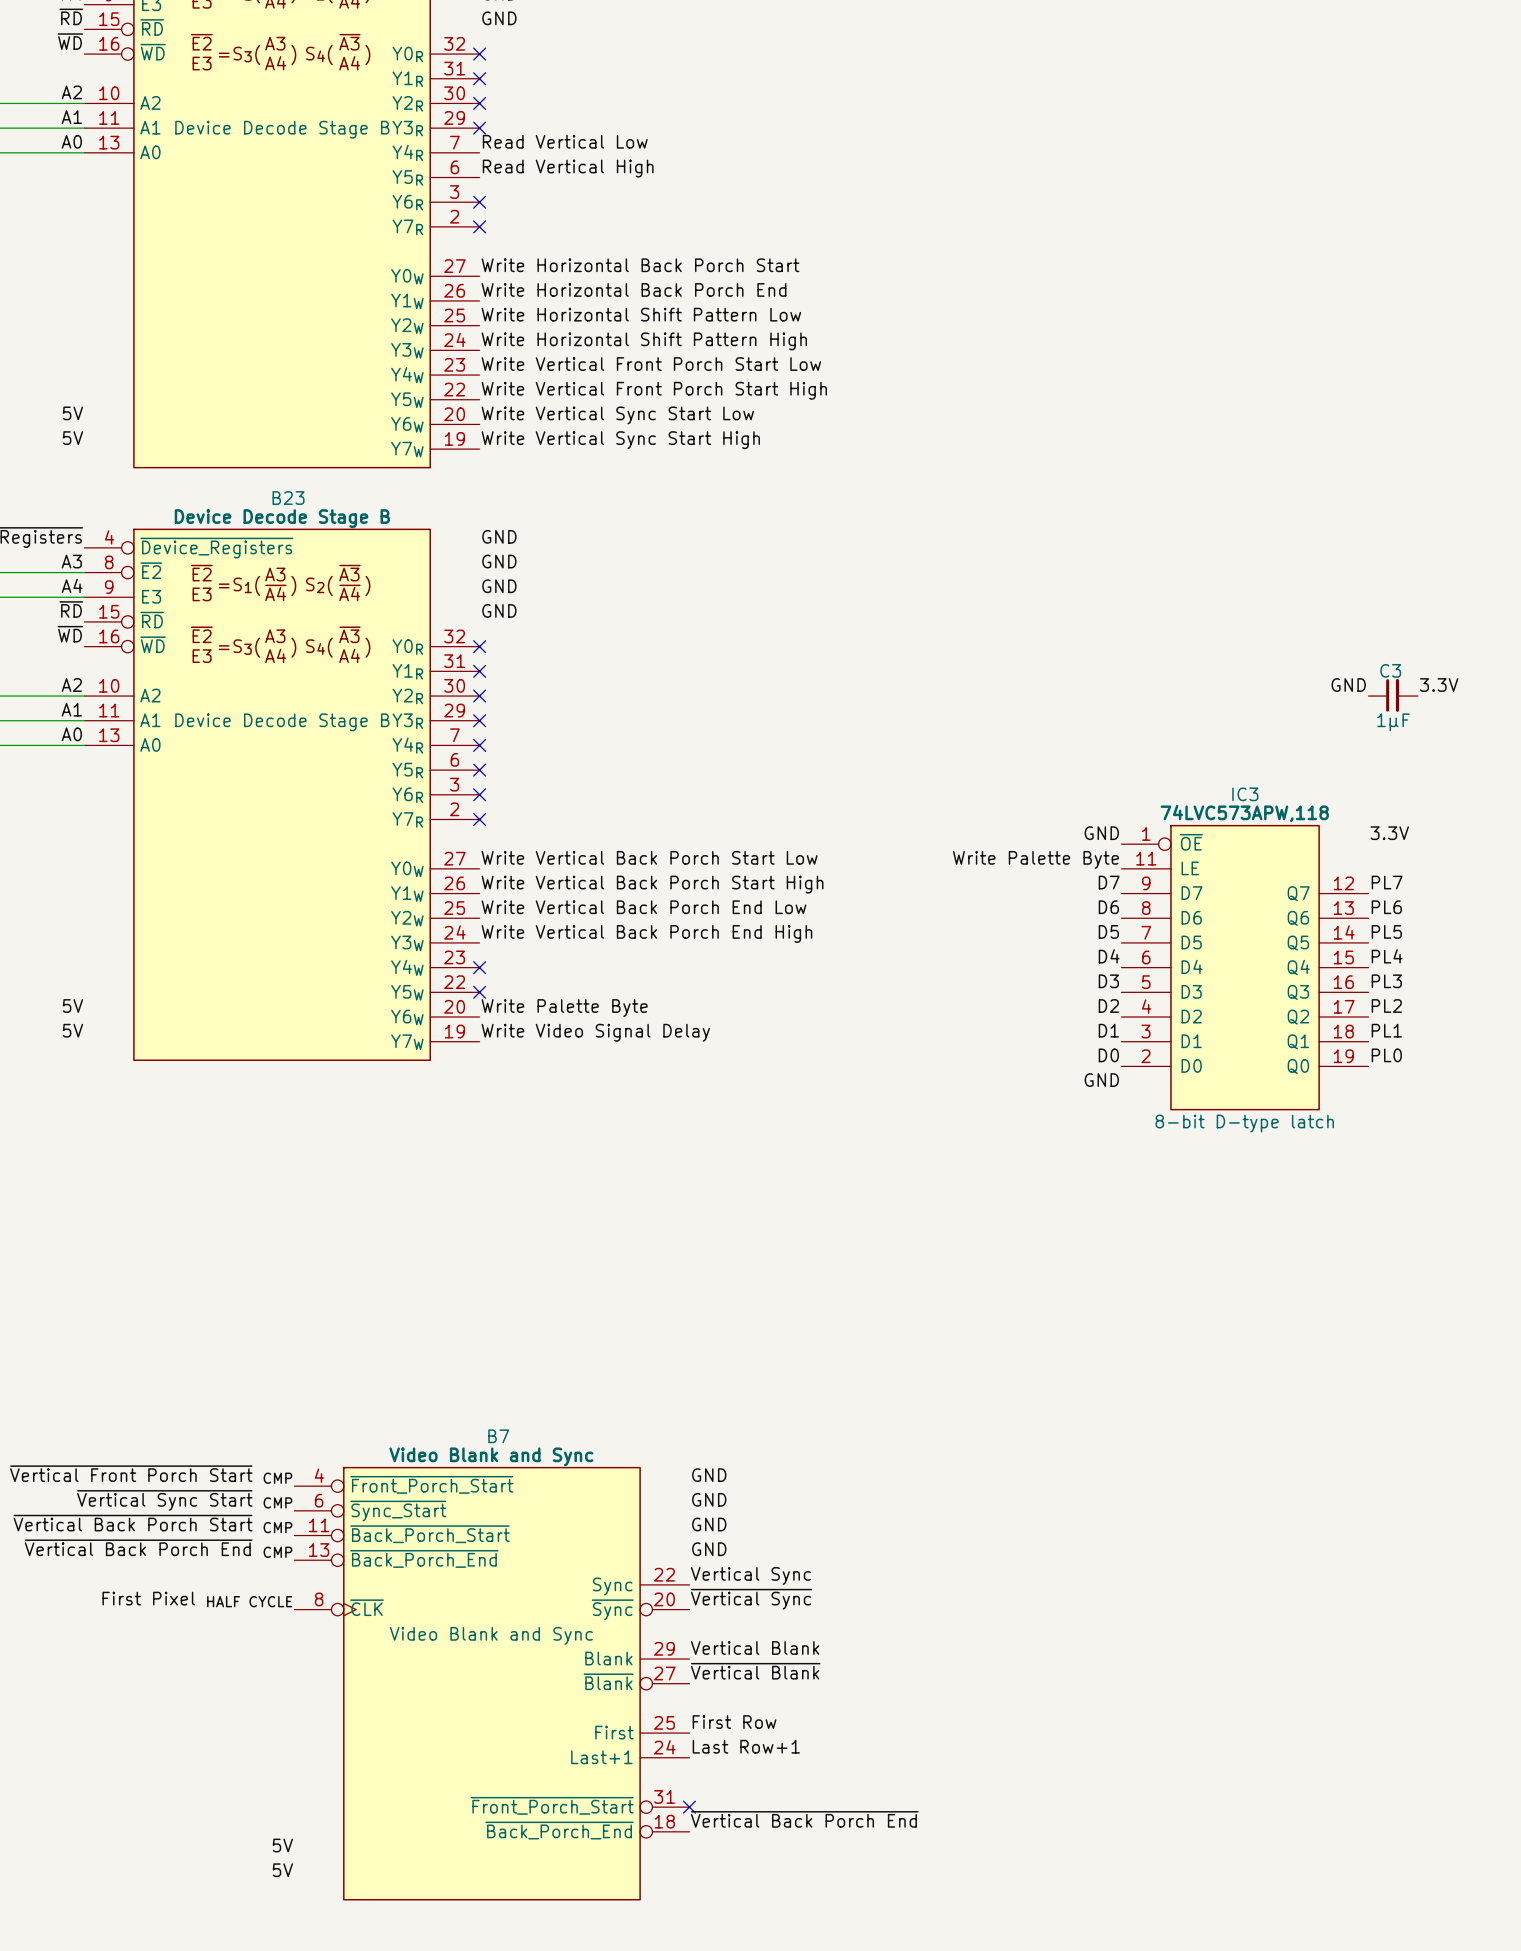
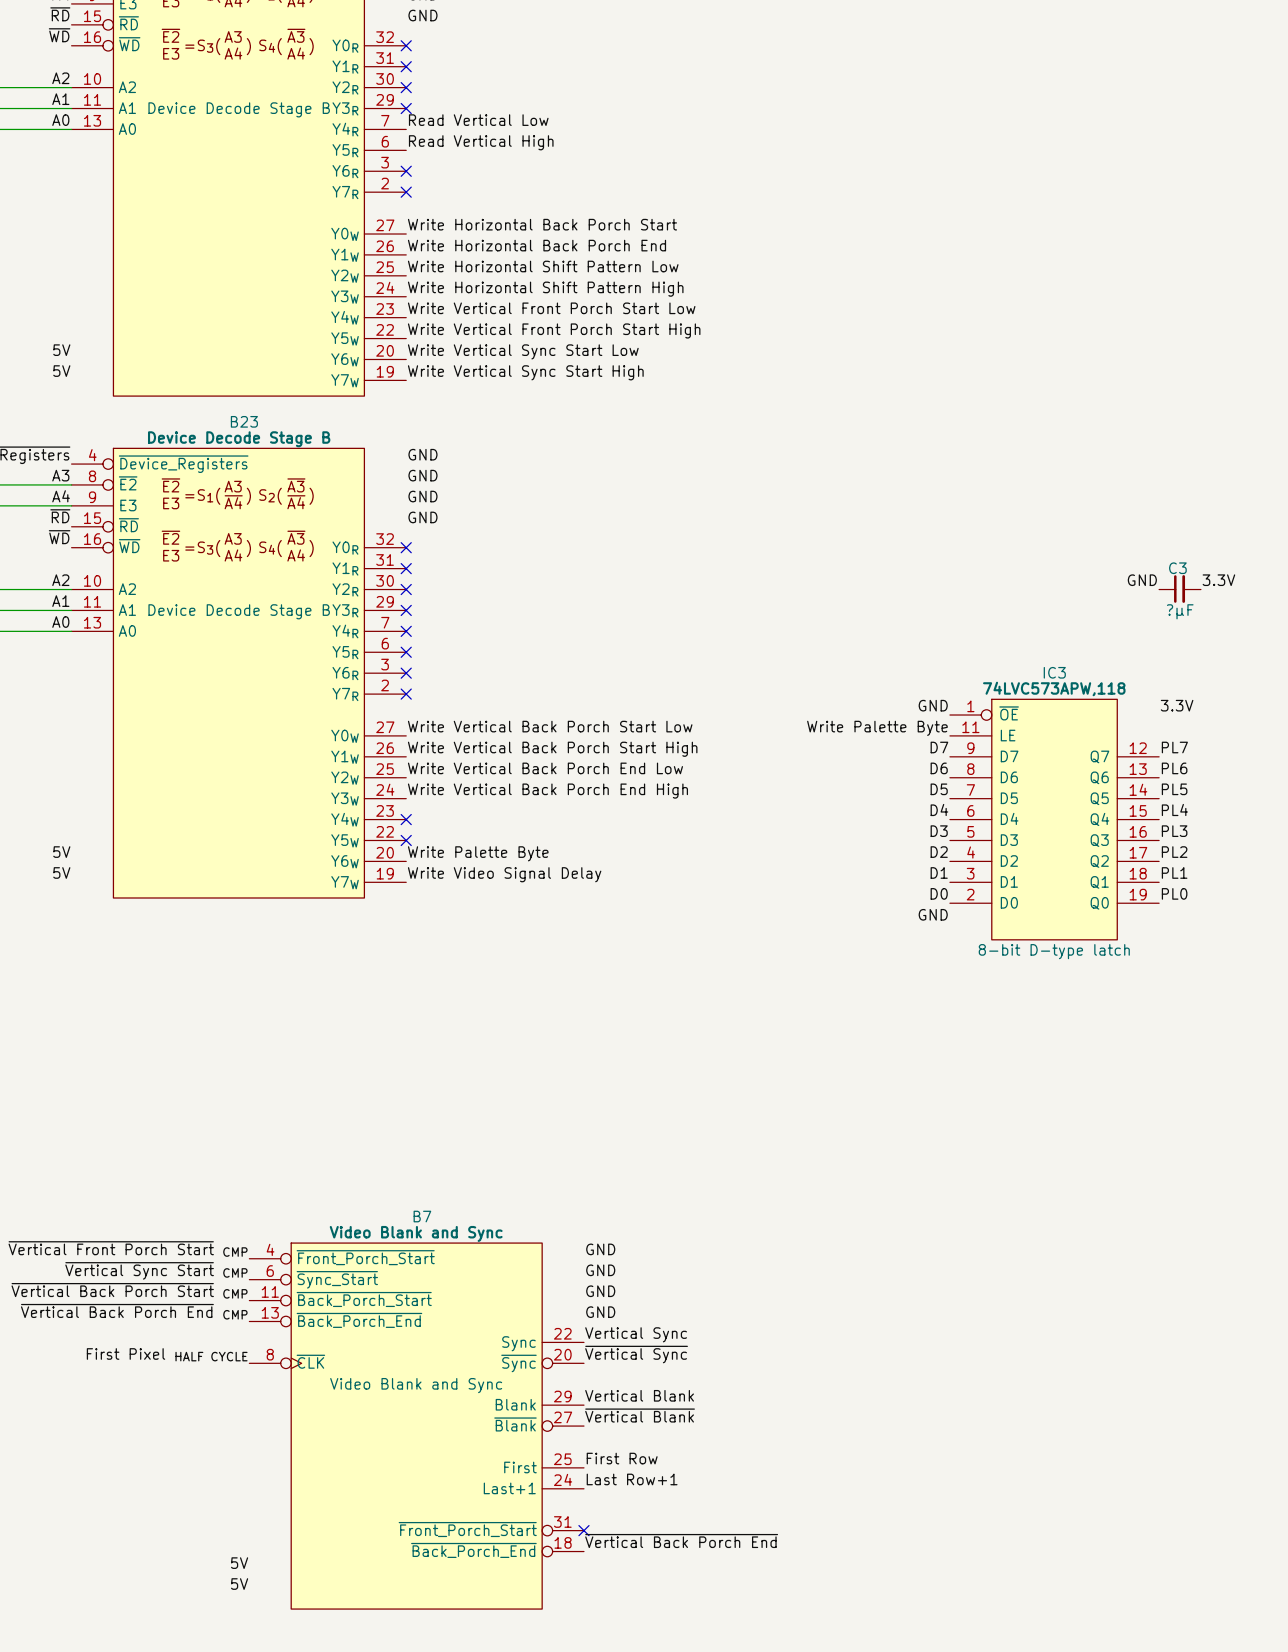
C3 value: 1μF (1393, 722) -> ?μF (1180, 611)

